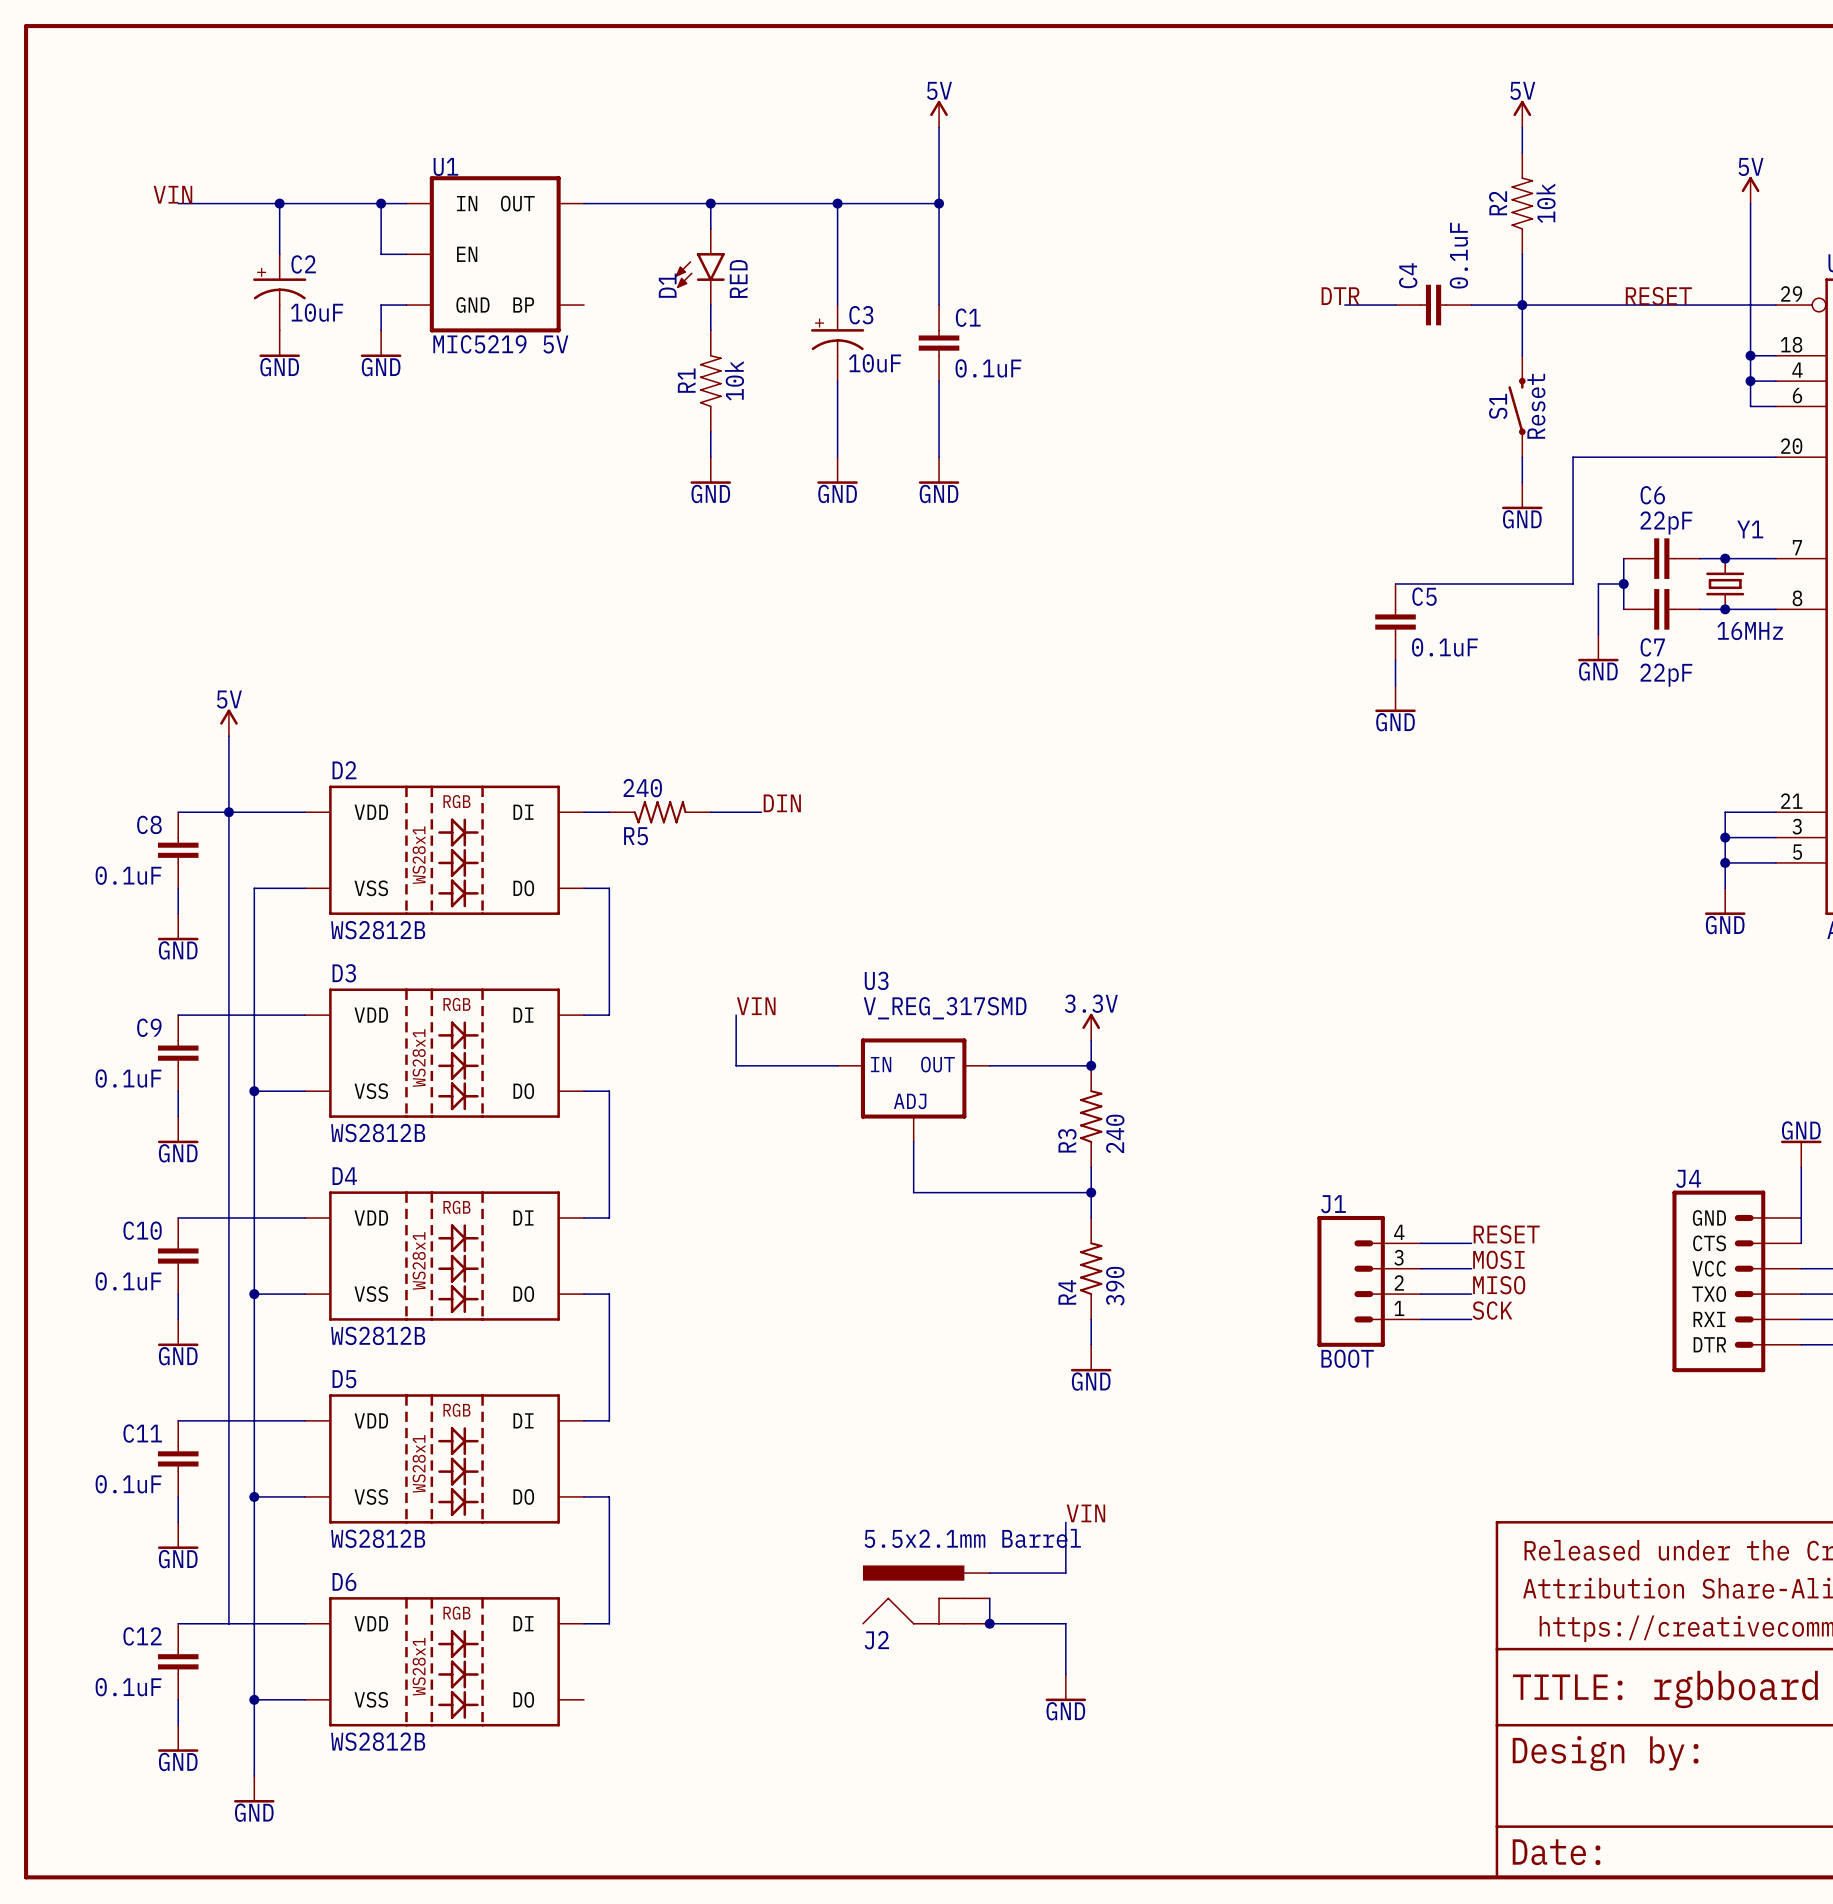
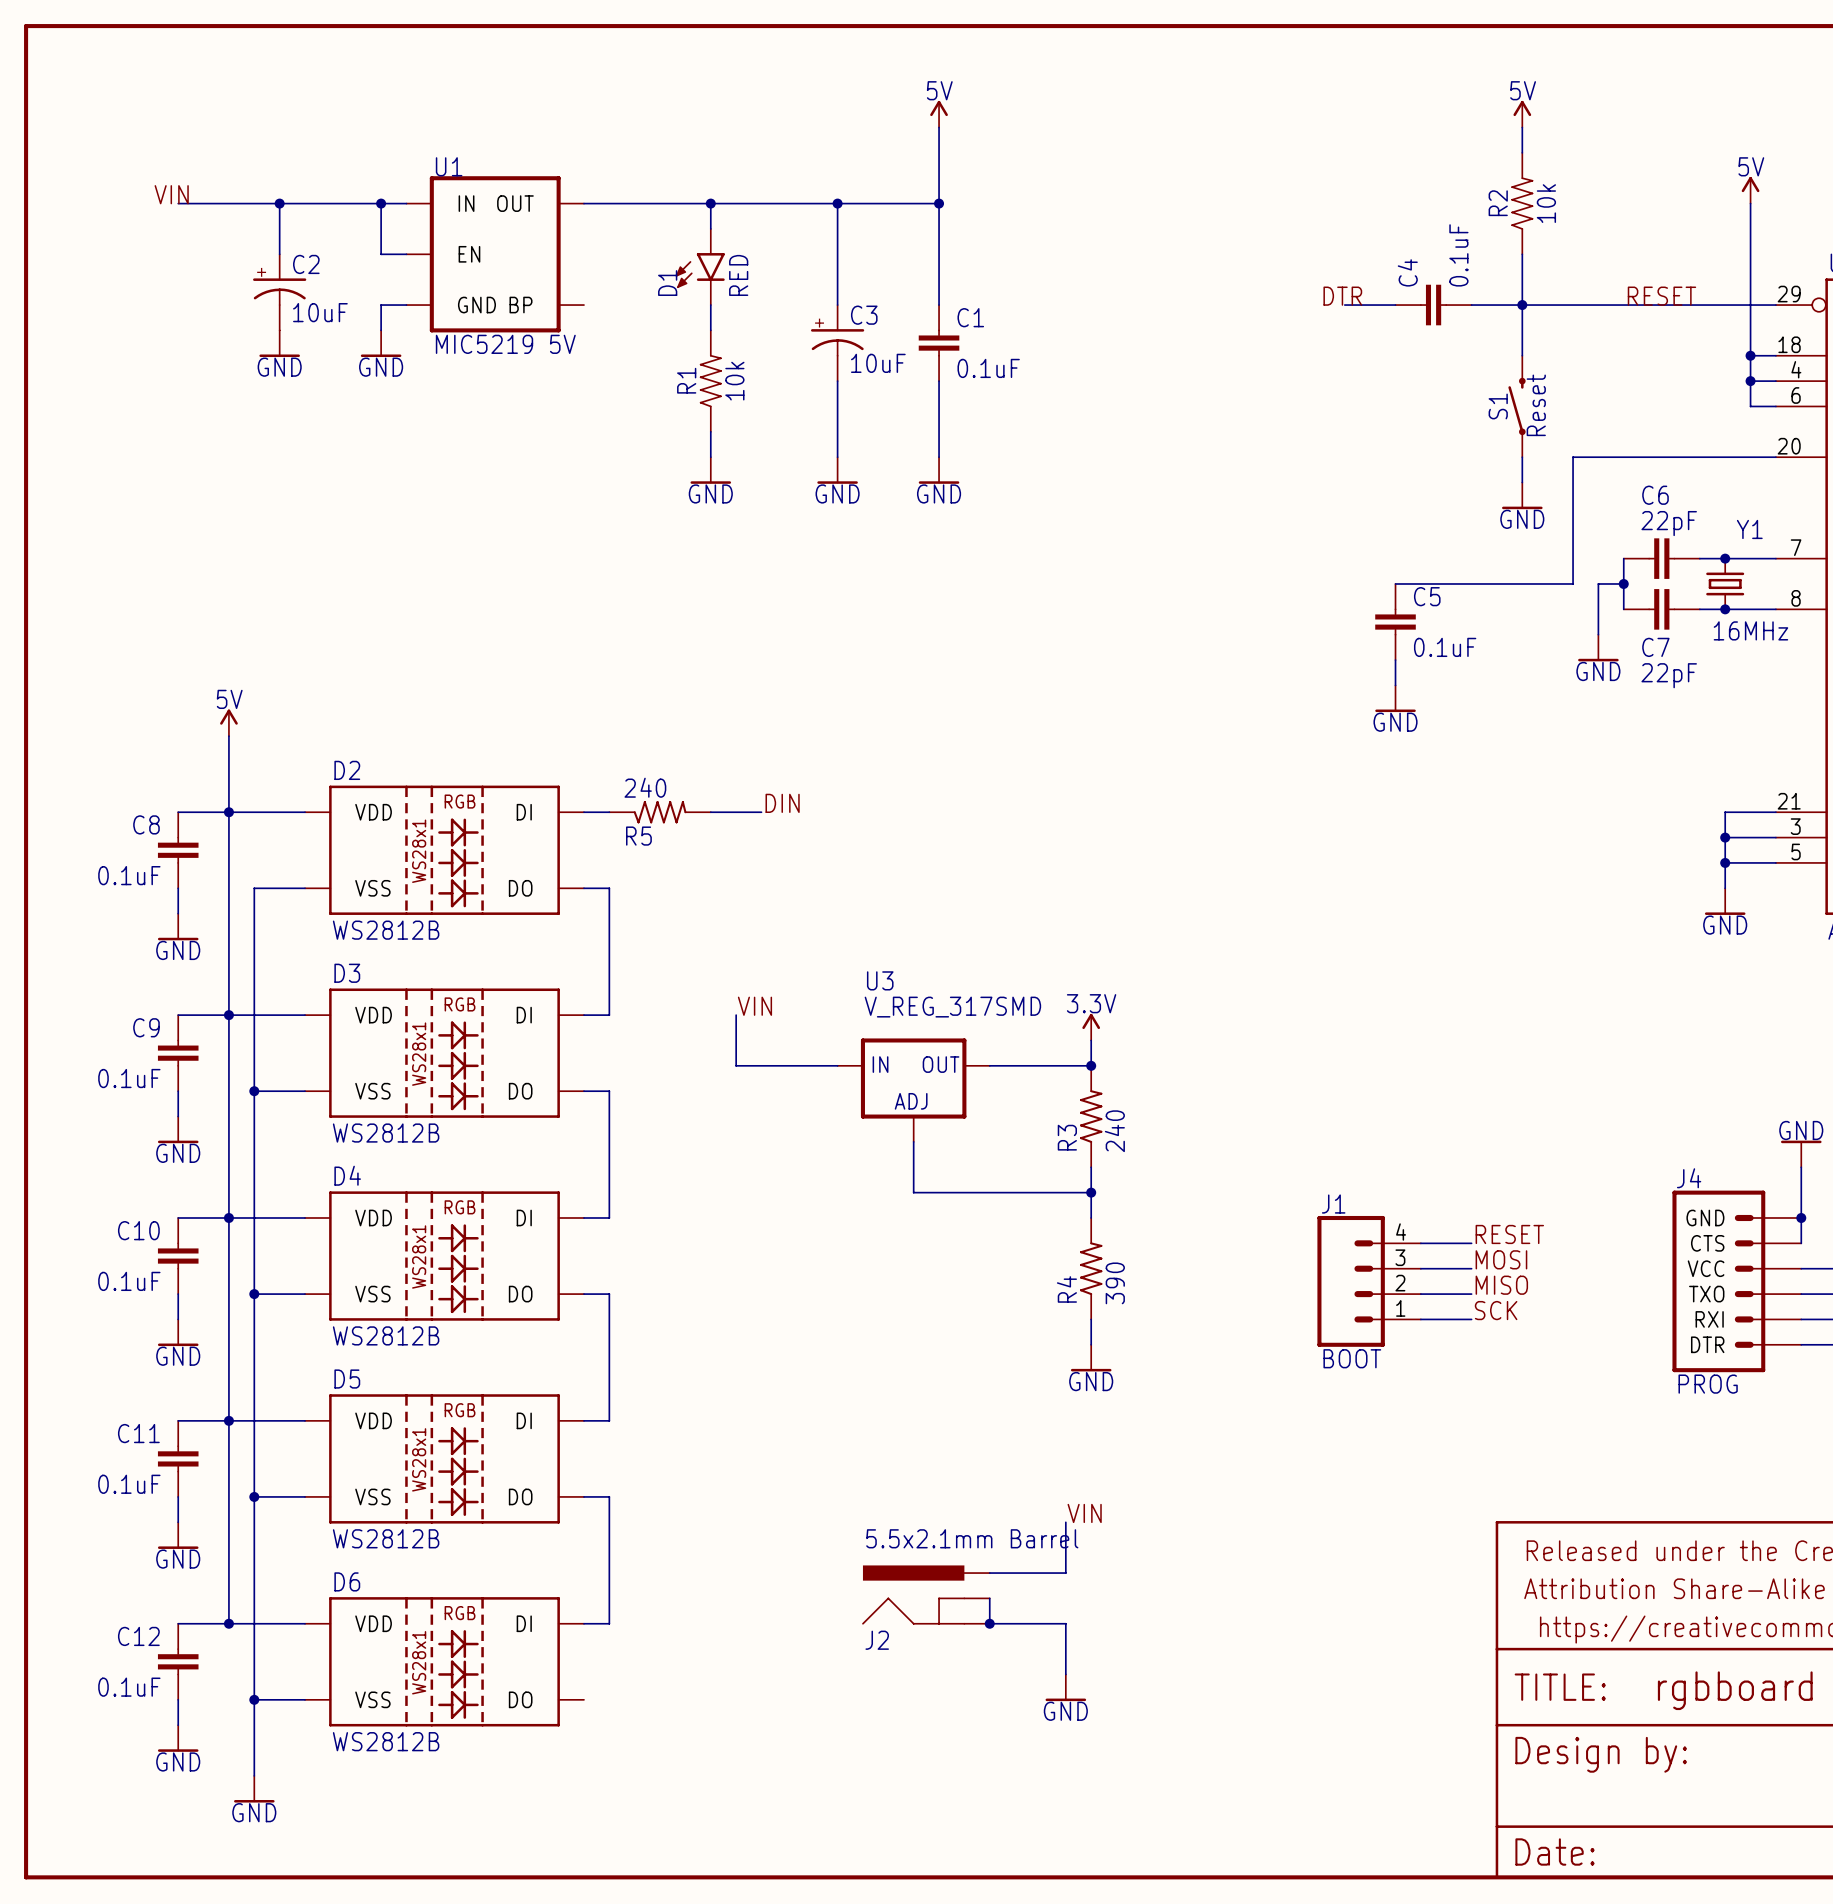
junction: none -> (228, 1015)
junction: none -> (228, 1217)
junction: none -> (1801, 1217)
J4 value: none -> PROG (1708, 1384)
junction: none -> (228, 1420)
junction: none -> (228, 1623)

